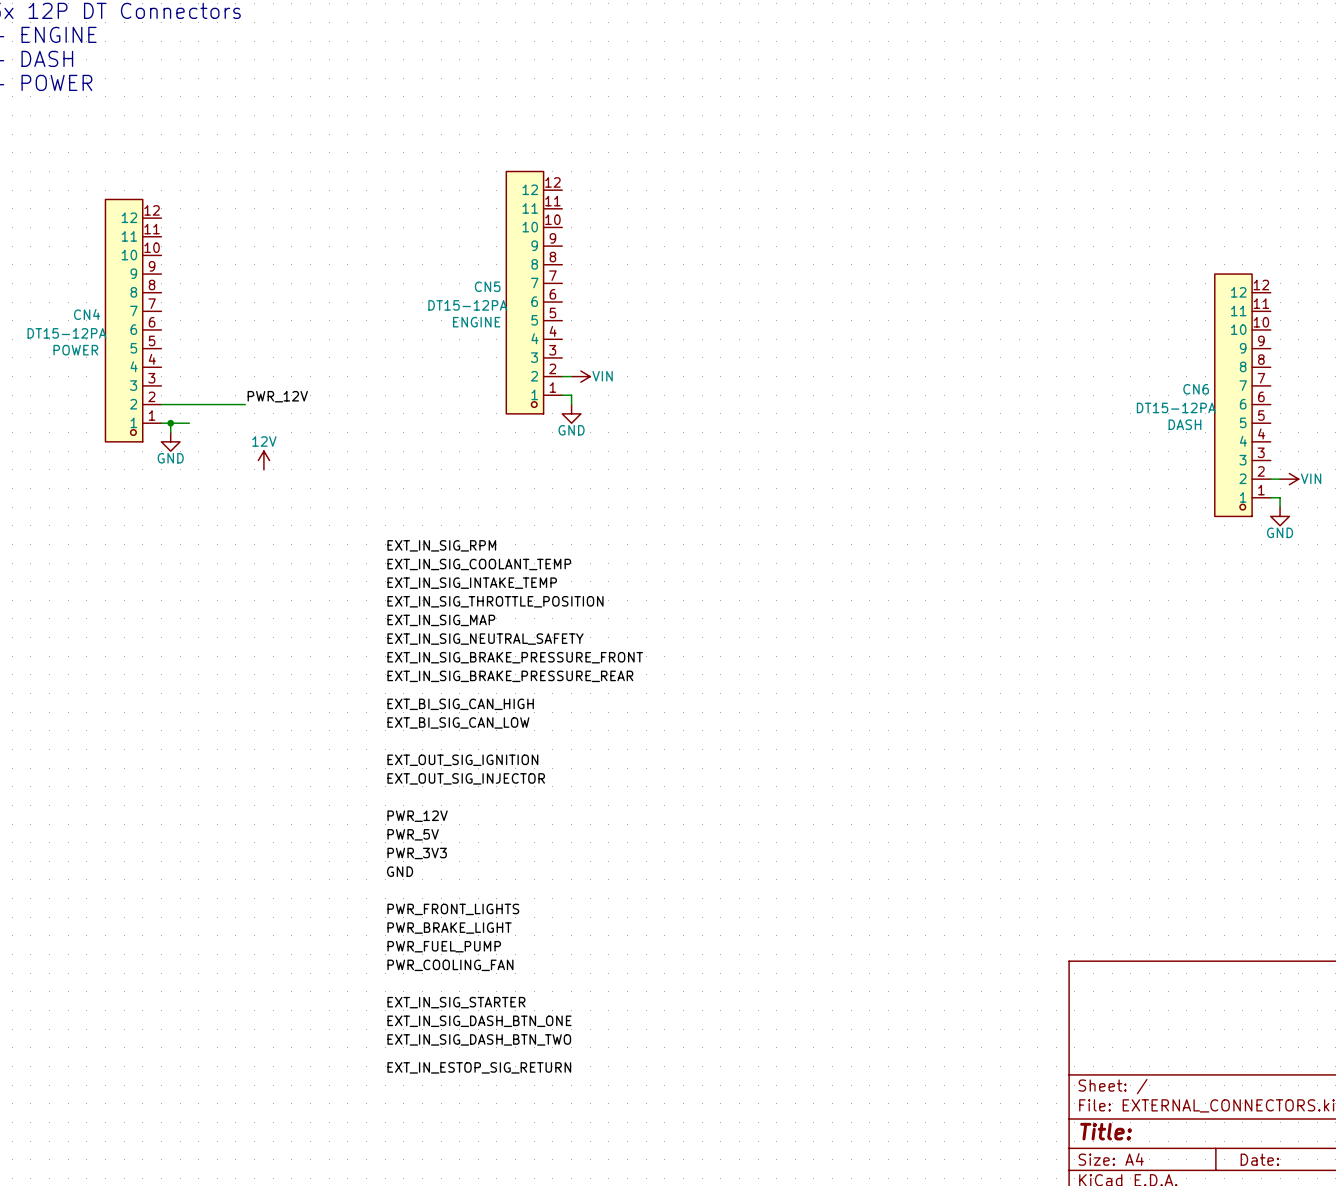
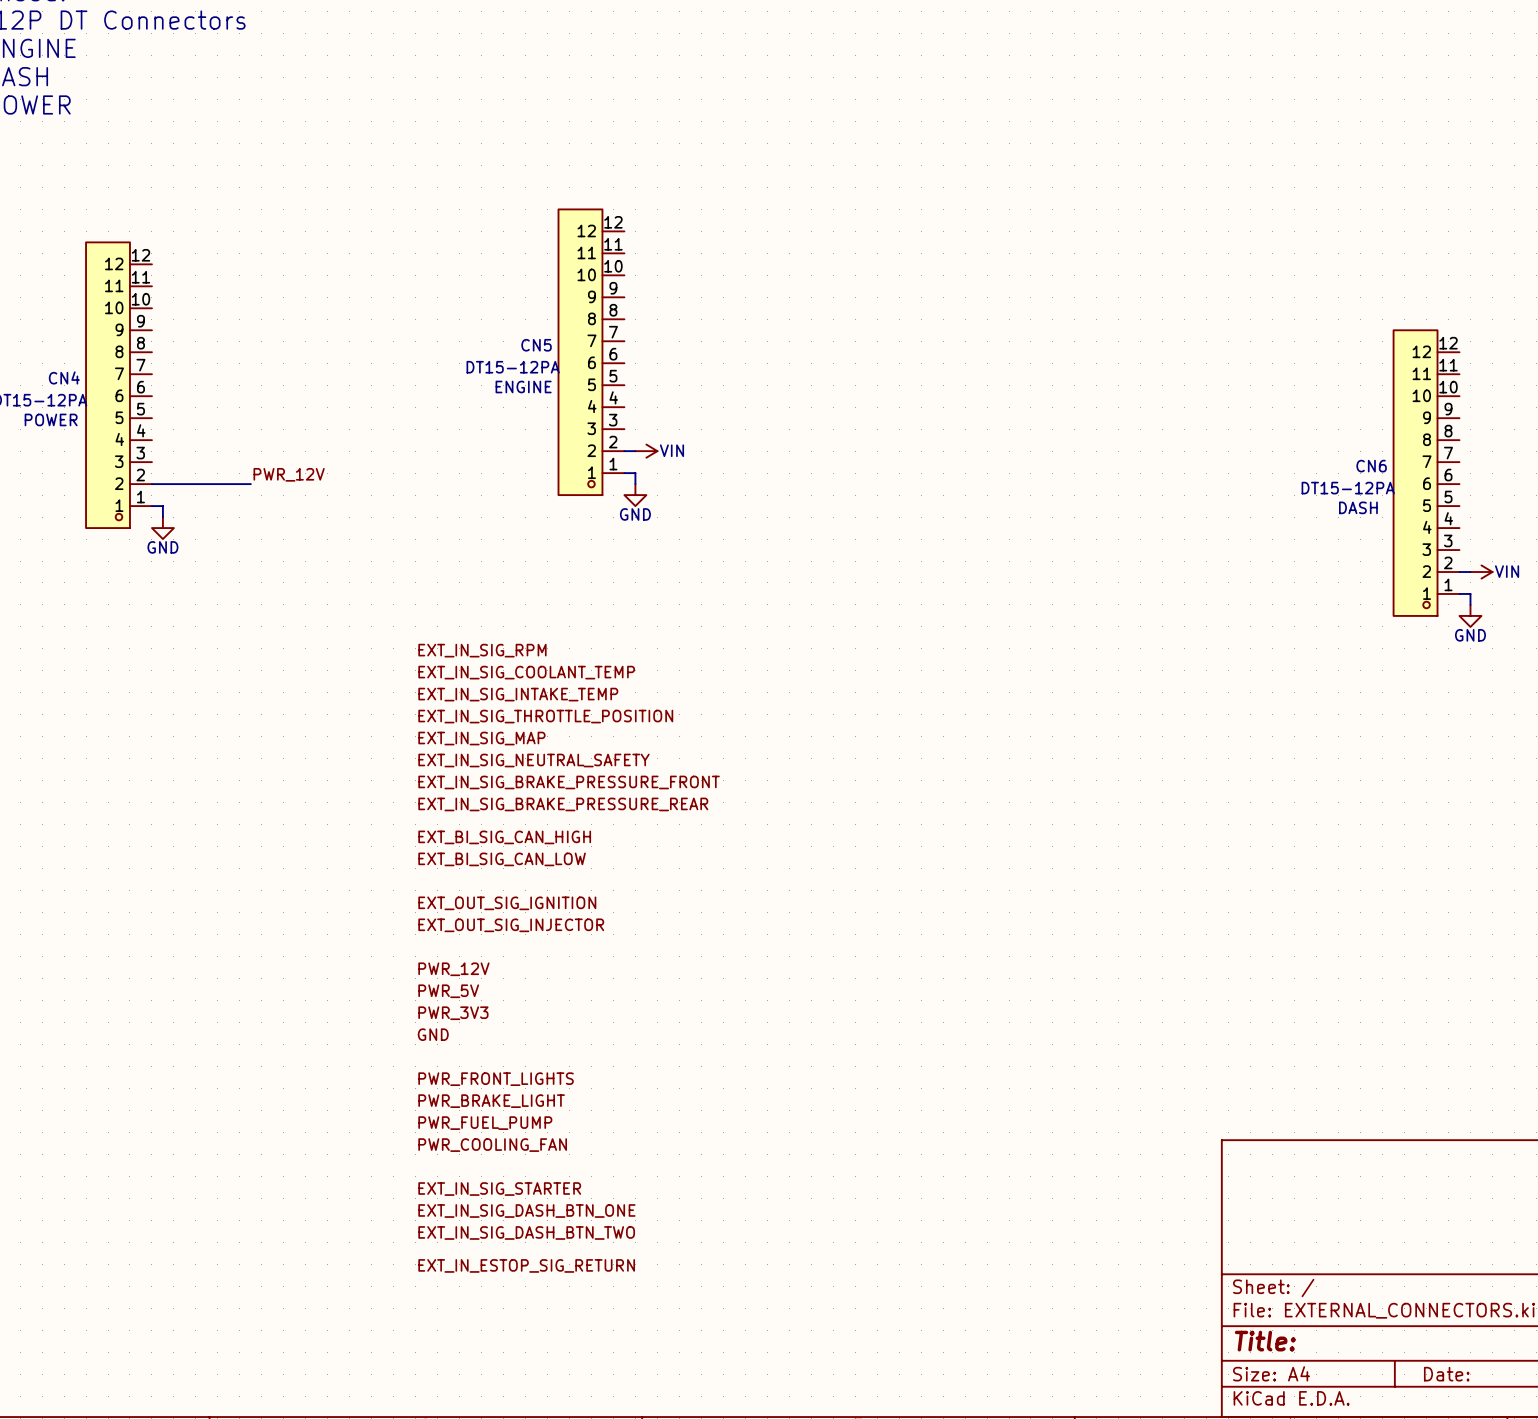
wire: (170, 423) (189, 423) -> none
junction: (170, 423) -> none
power symbol: 12V (263, 460) -> none

